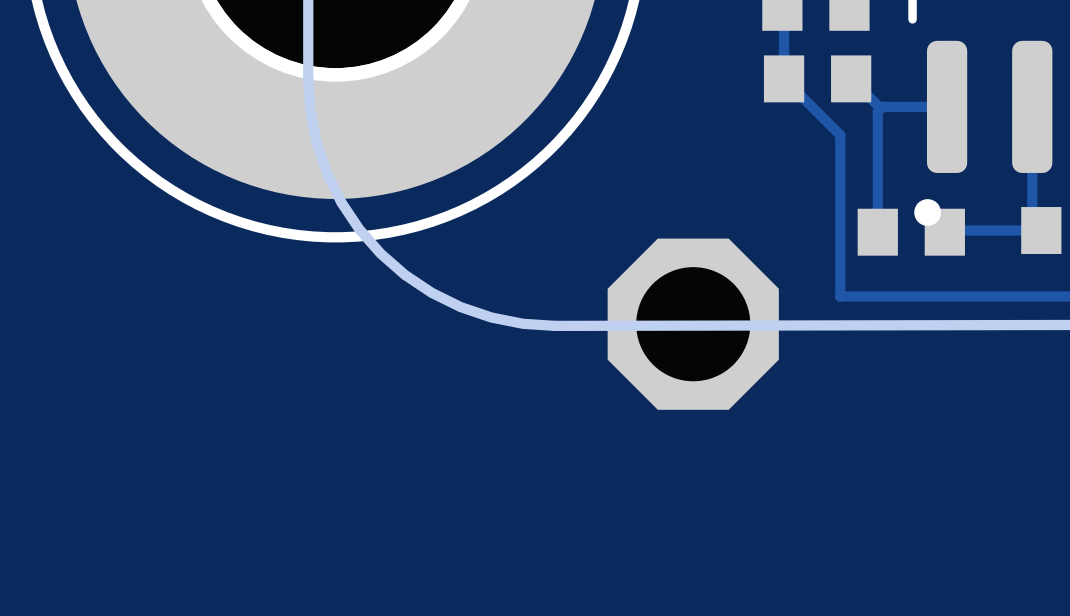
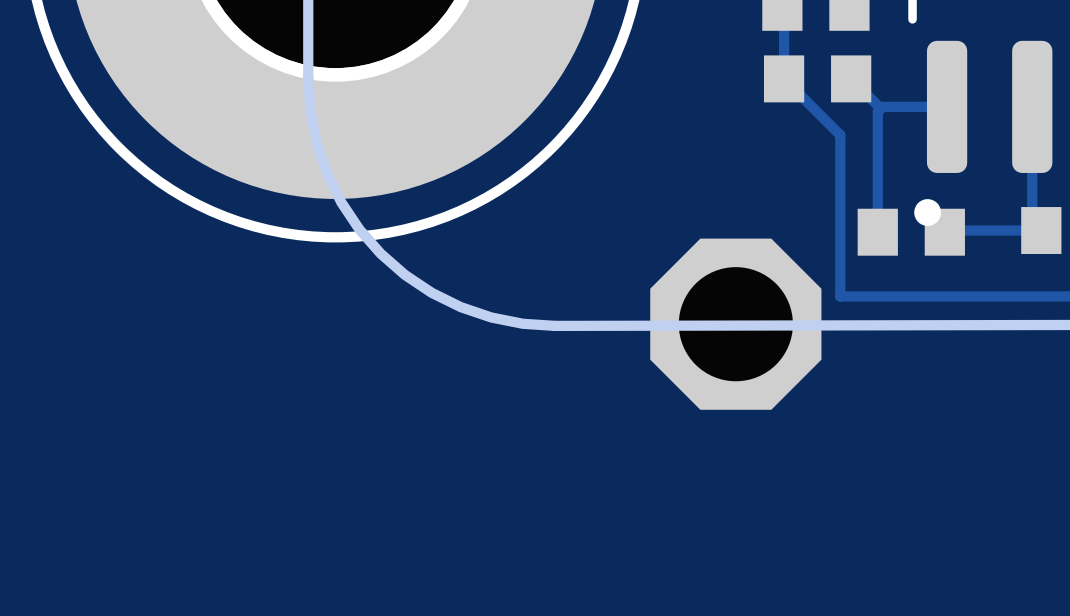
part position: (693, 324) -> (735, 324)

